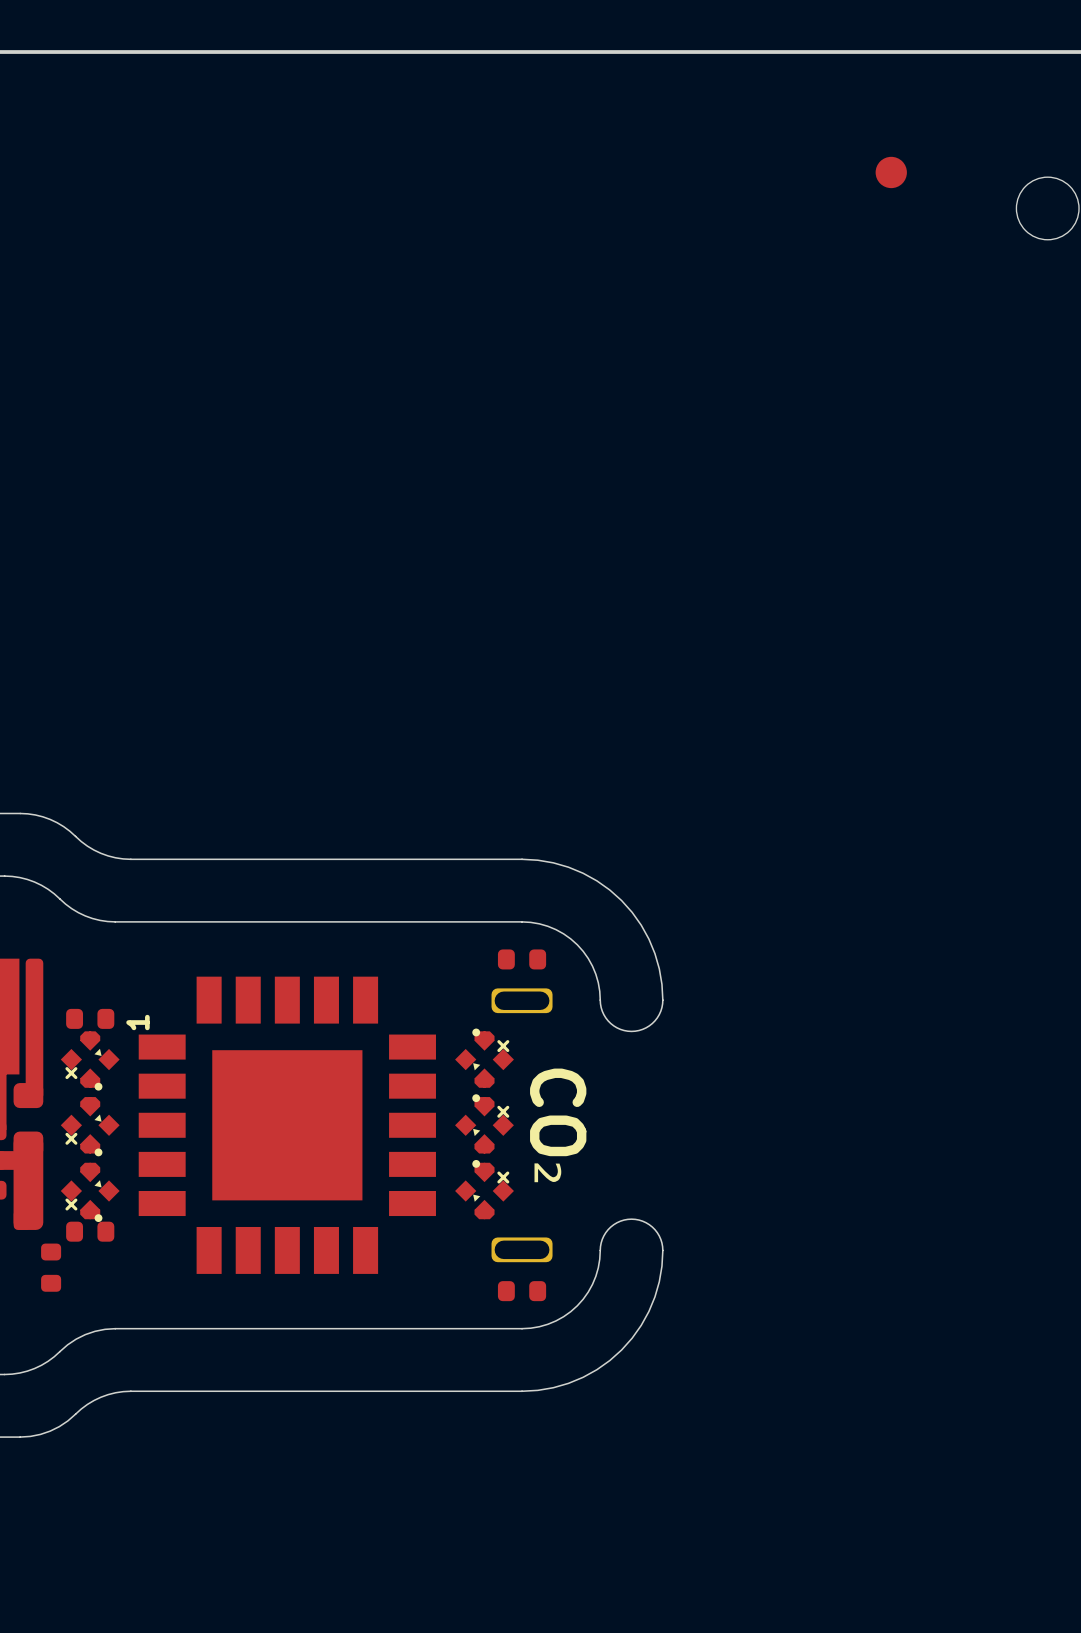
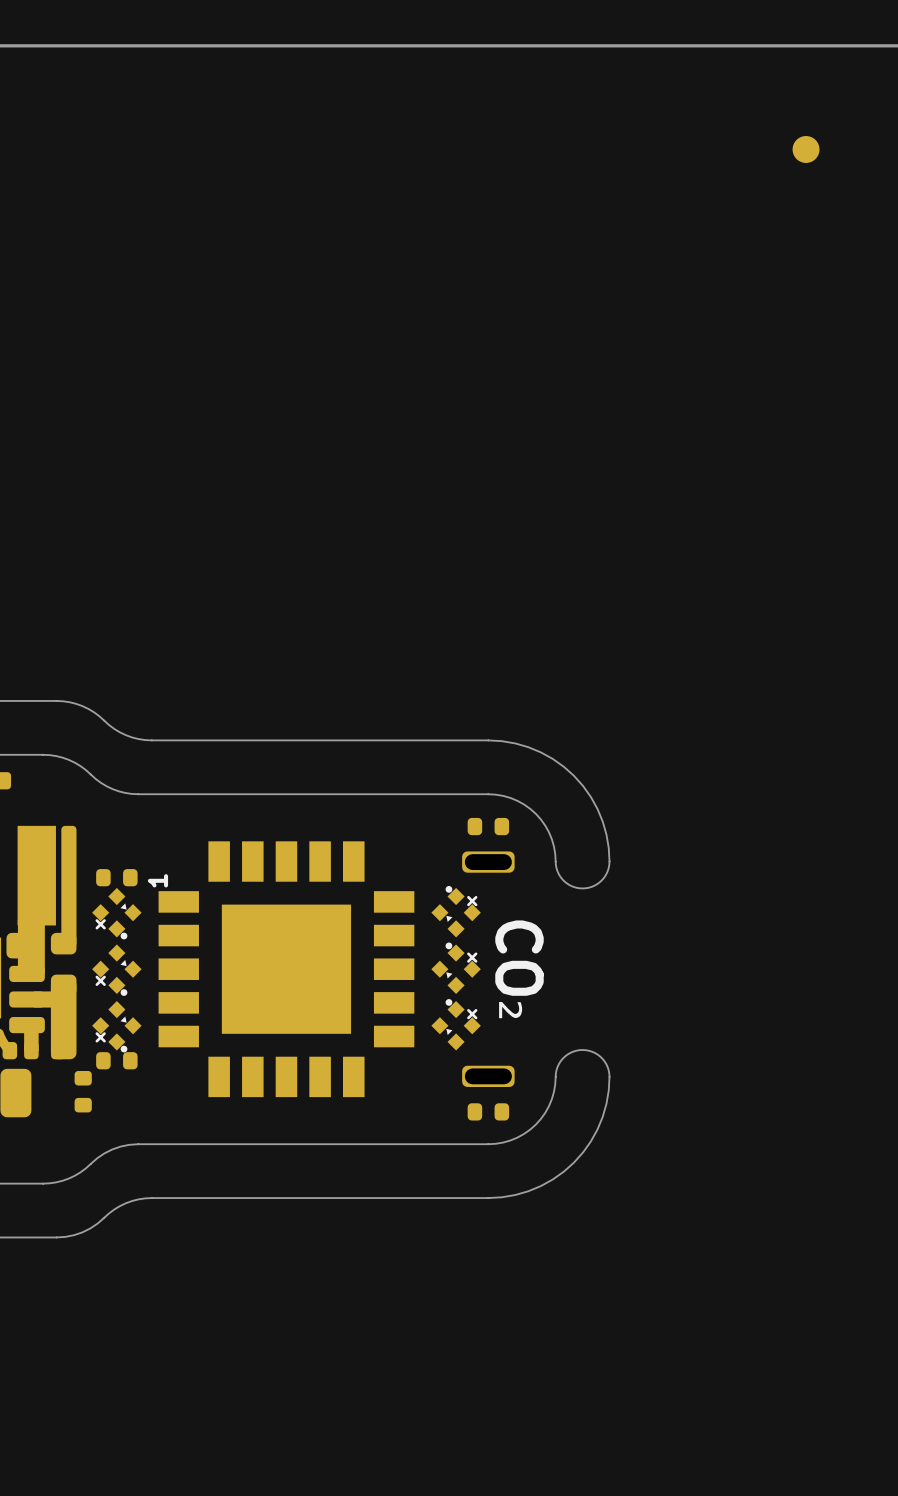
part footprint: [455, 1028, 514, 1088] -> [431, 886, 481, 938]
part footprint: [60, 1031, 120, 1091] -> [92, 887, 142, 940]
part footprint: [455, 1094, 514, 1154] -> [431, 942, 481, 994]
part footprint: [60, 1097, 120, 1157] -> [92, 944, 142, 996]
part footprint: [455, 1159, 514, 1220] -> [431, 999, 481, 1051]
part footprint: [60, 1162, 120, 1223] -> [92, 1001, 142, 1053]

